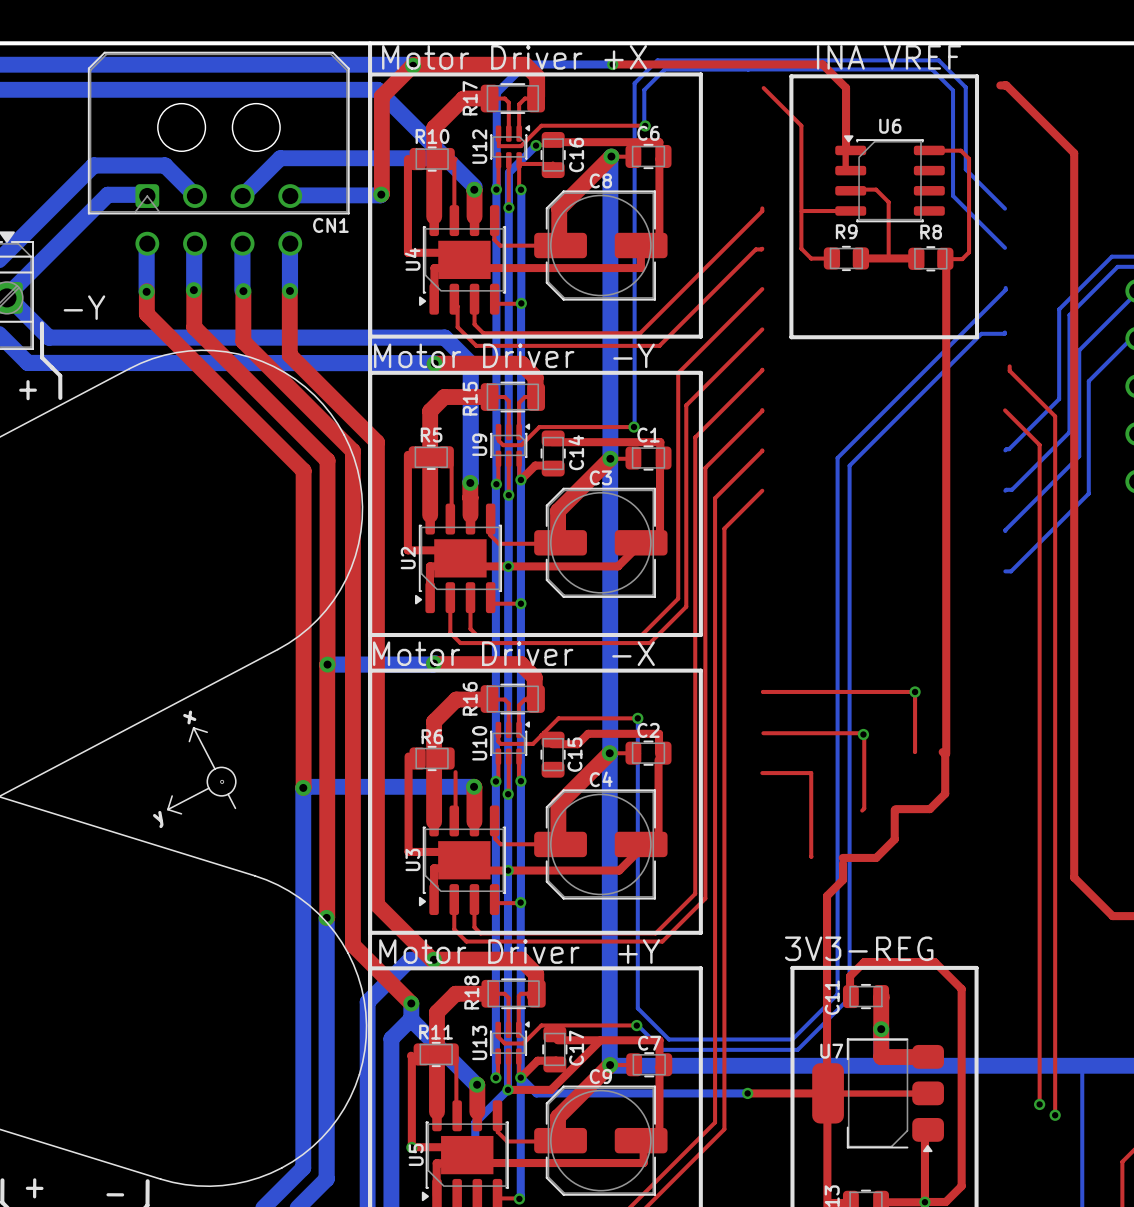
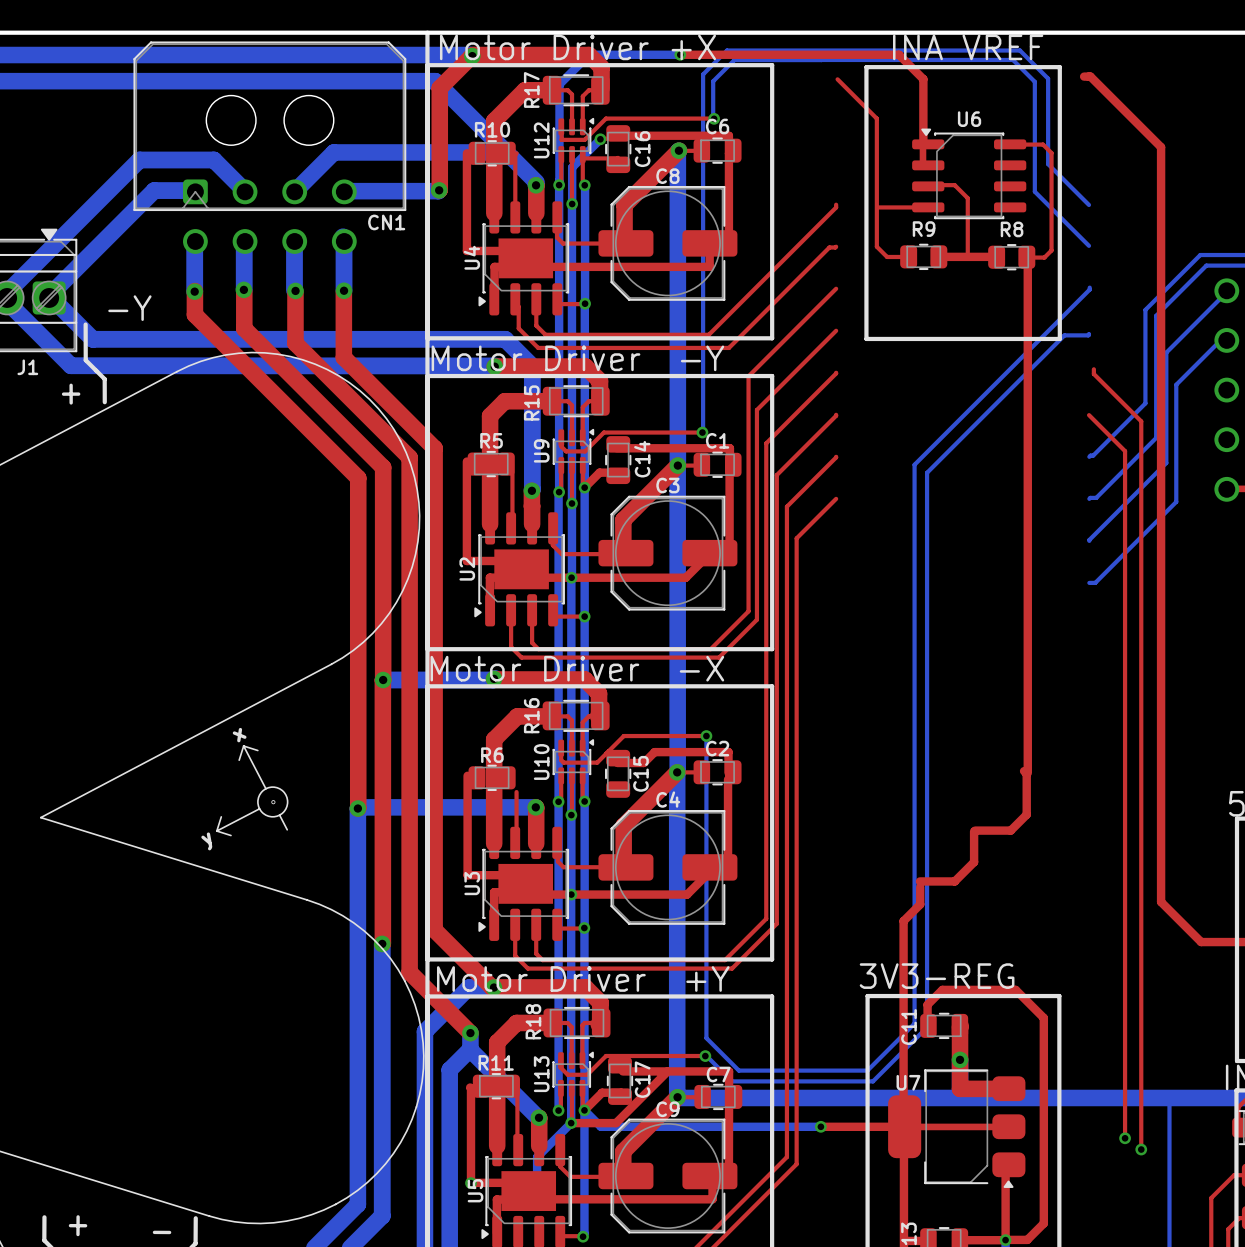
top track: (763, 691) (915, 691) (915, 751) -> none
via: (915, 691) -> none
top track: (763, 733) (862, 733) -> none
via: (863, 734) -> none
top track: (864, 734) (864, 808) (862, 810) -> none
top track: (762, 773) (811, 773) (811, 856) -> none

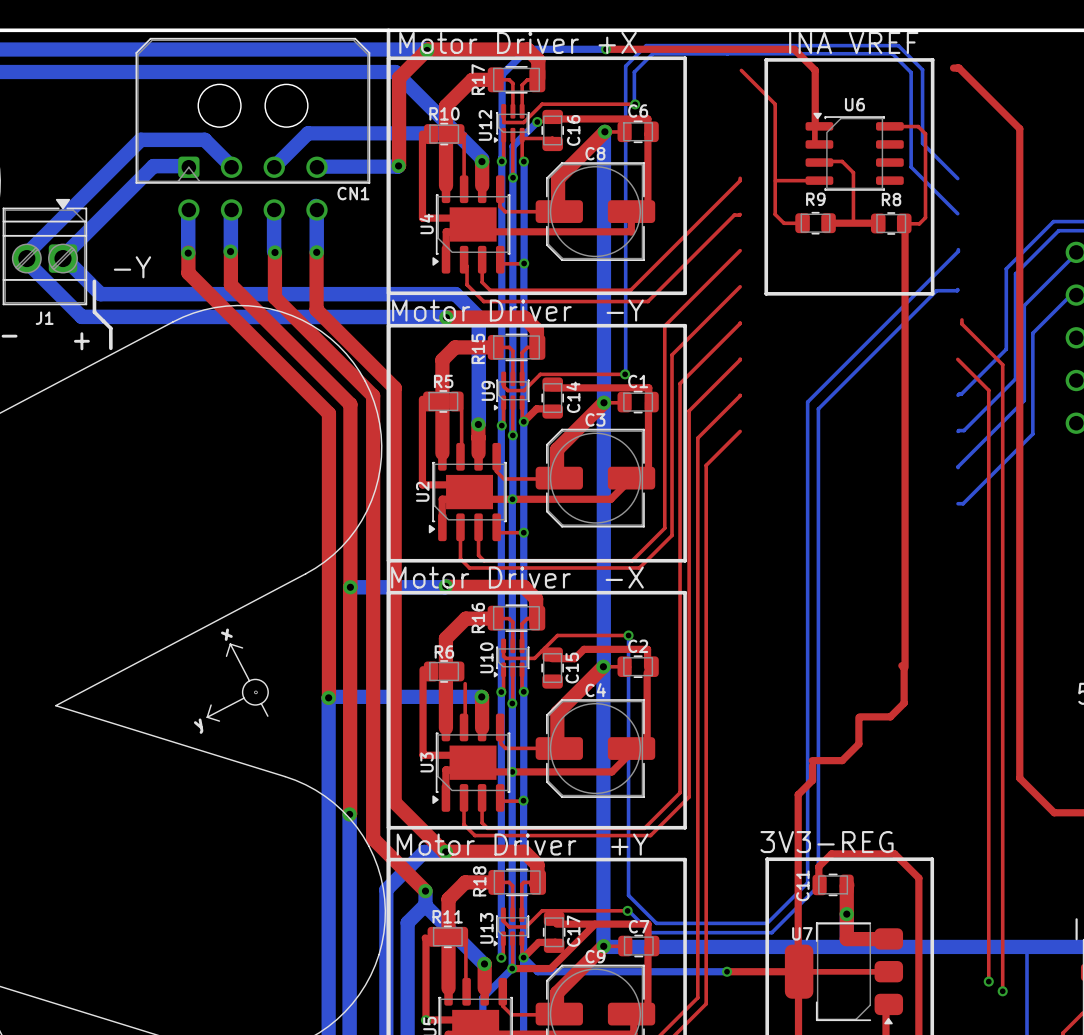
U12 rotation: 0° (573, 140) -> 180° (511, 123)
U9 rotation: 0° (573, 451) -> 180° (511, 391)
U10 rotation: 0° (573, 761) -> 180° (511, 658)
U13 rotation: 0° (573, 1074) -> 180° (511, 926)

